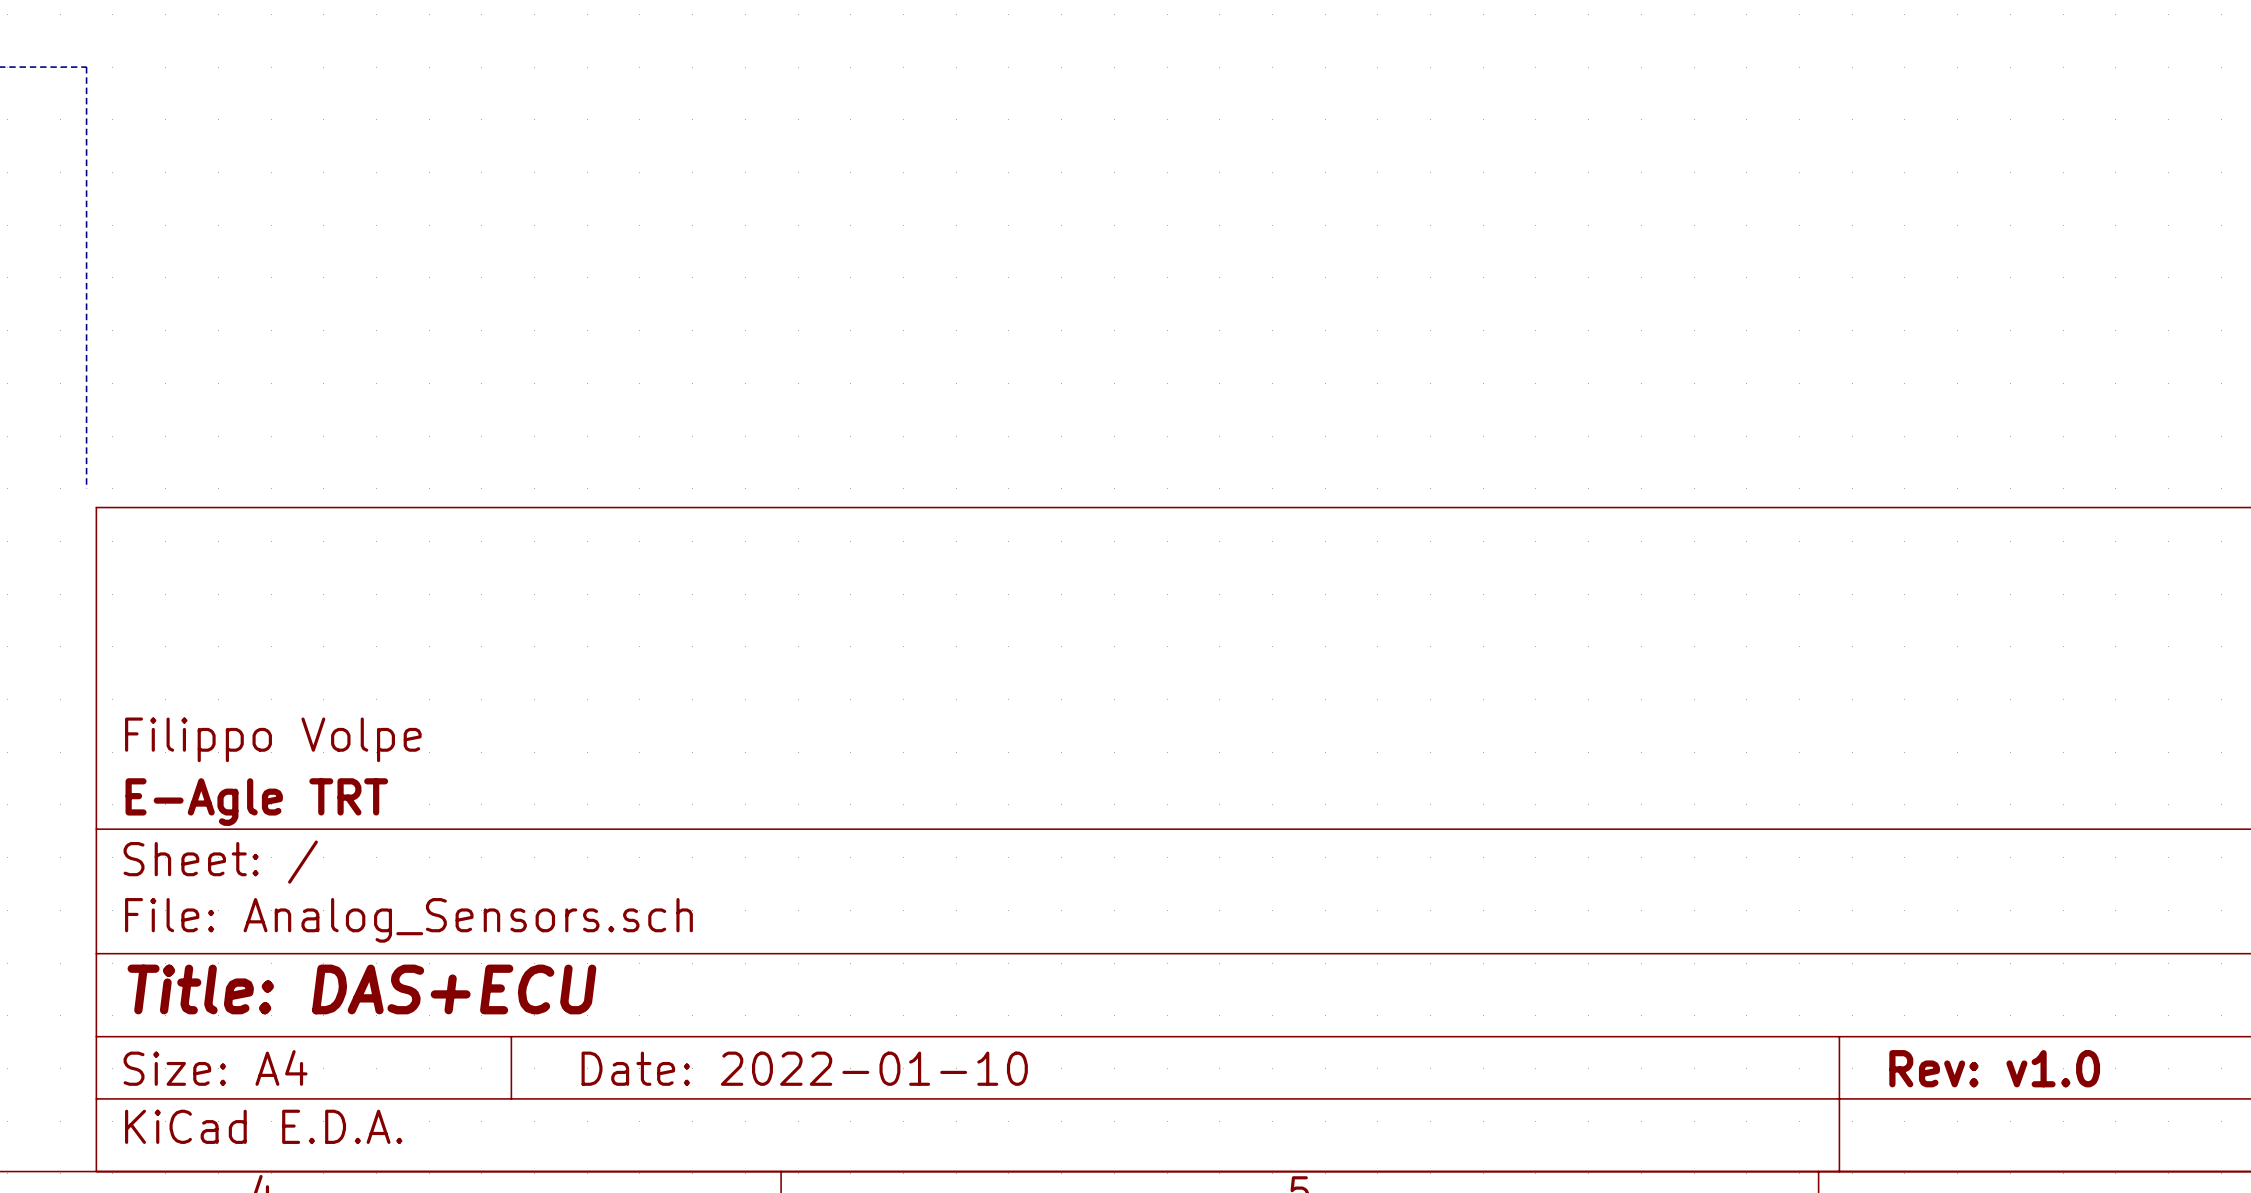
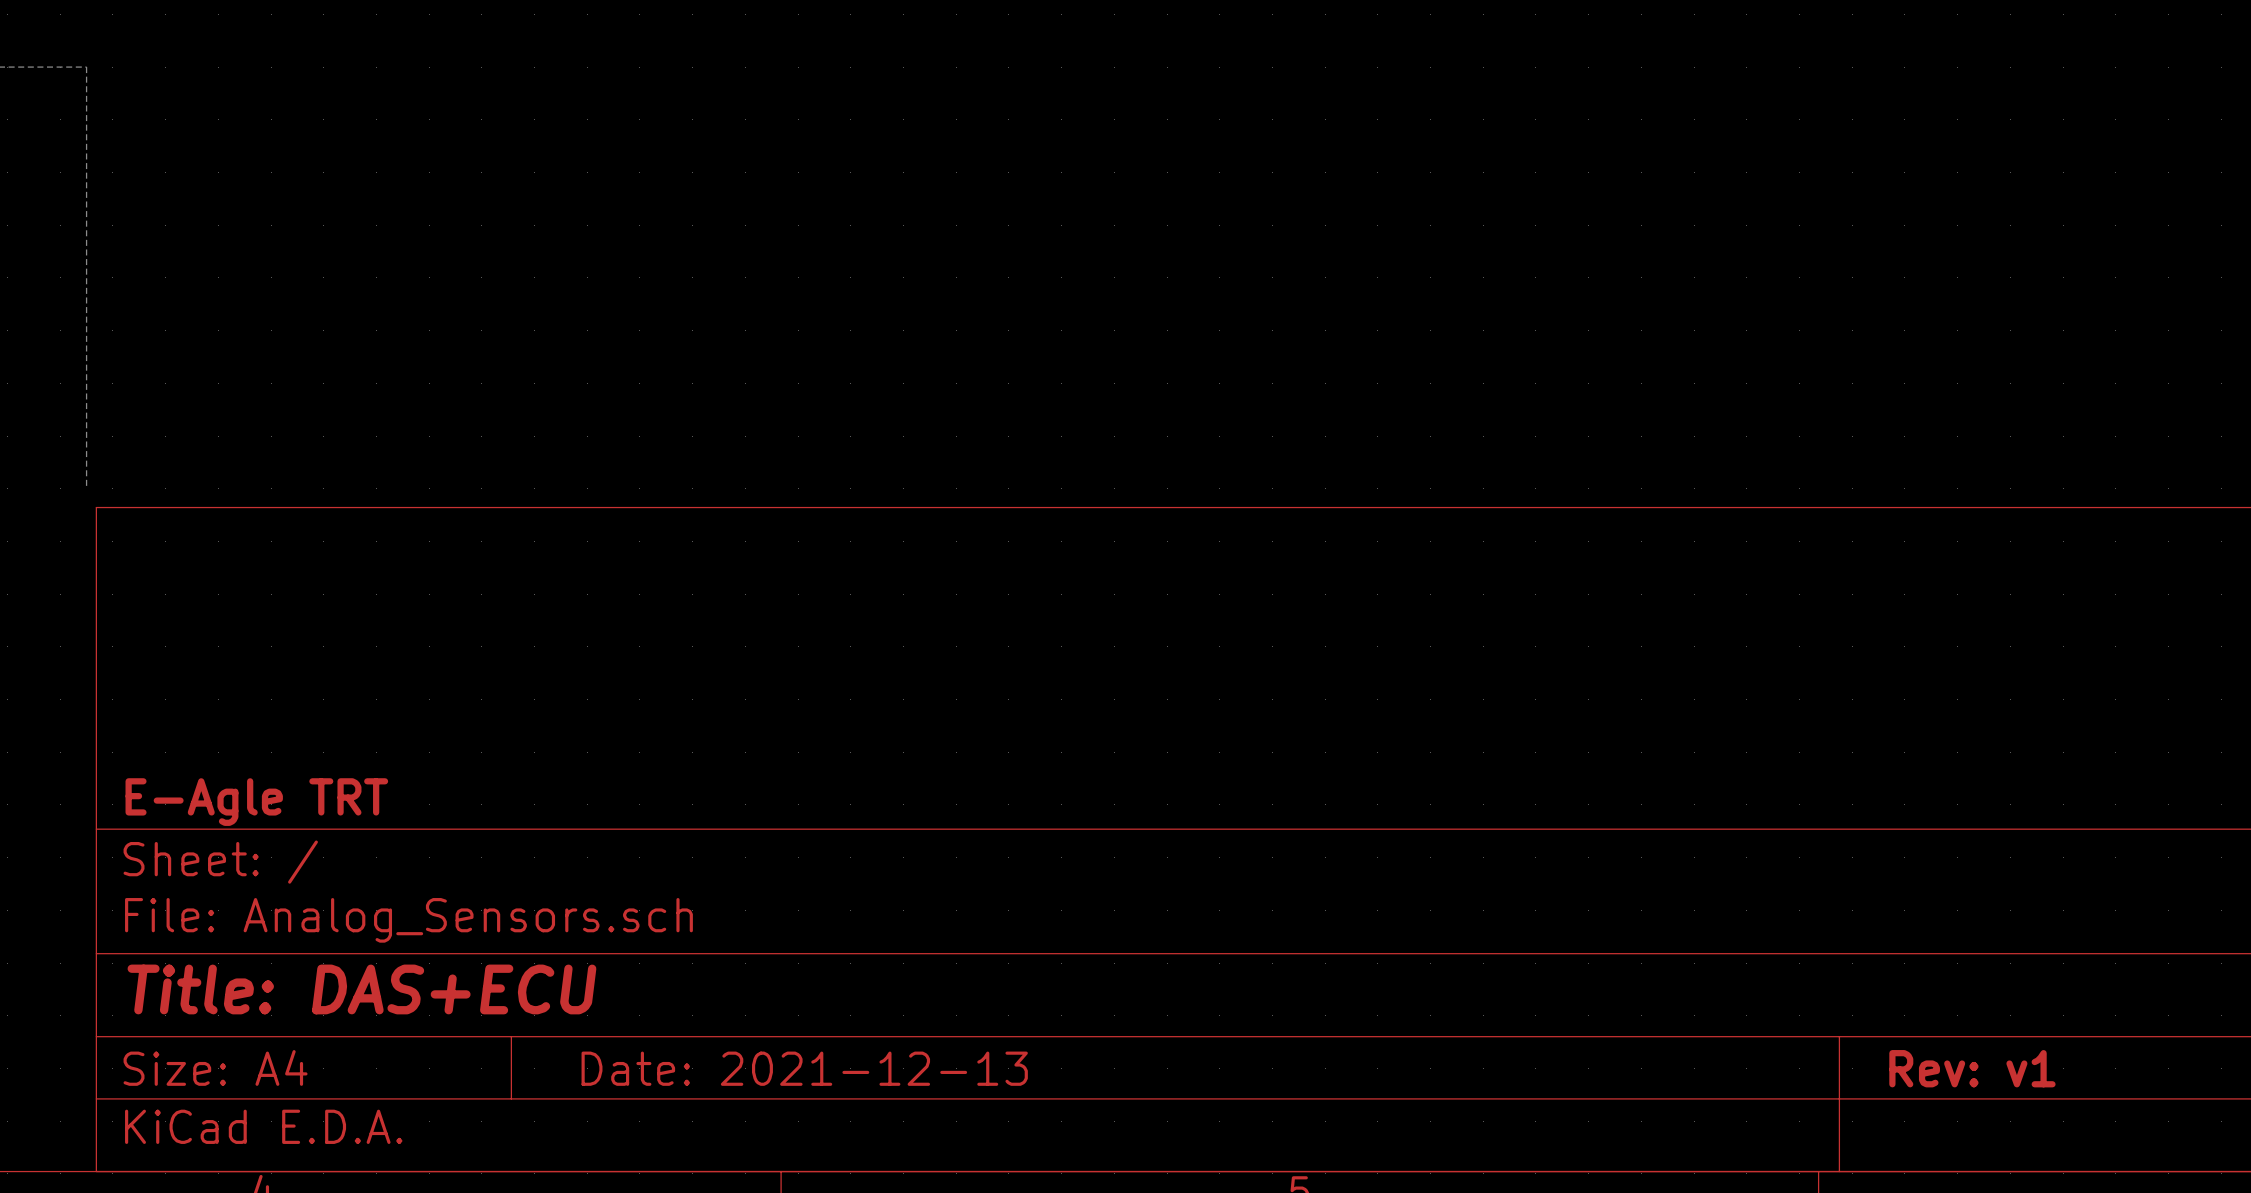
title block: Filippo Volpe (273, 739) -> none
title block: Date: 2022-01-10 (804, 1068) -> Date: 2021-12-13 (804, 1068)
title block: Rev: v1.0 (1994, 1068) -> Rev: v1 (1972, 1068)

